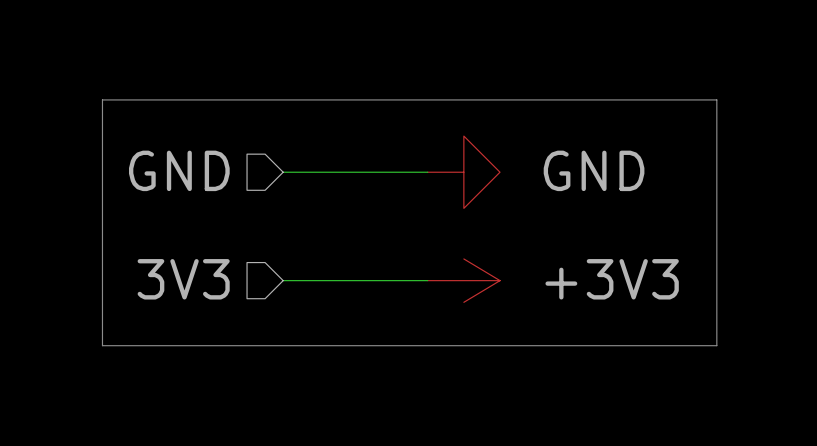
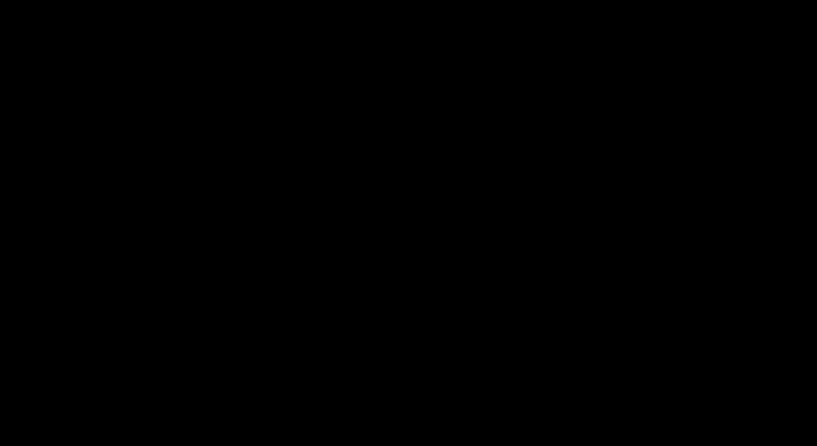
line: (102, 99) (716, 99) (716, 345) (102, 345) (102, 99) -> none
hierarchical label: GND (179, 170) -> none
wire: (283, 172) (427, 172) -> none
power symbol: GND (463, 172) -> none
hierarchical label: 3V3 (183, 279) -> none
wire: (283, 280) (427, 280) -> none
power symbol: +3V3 (463, 280) -> none

